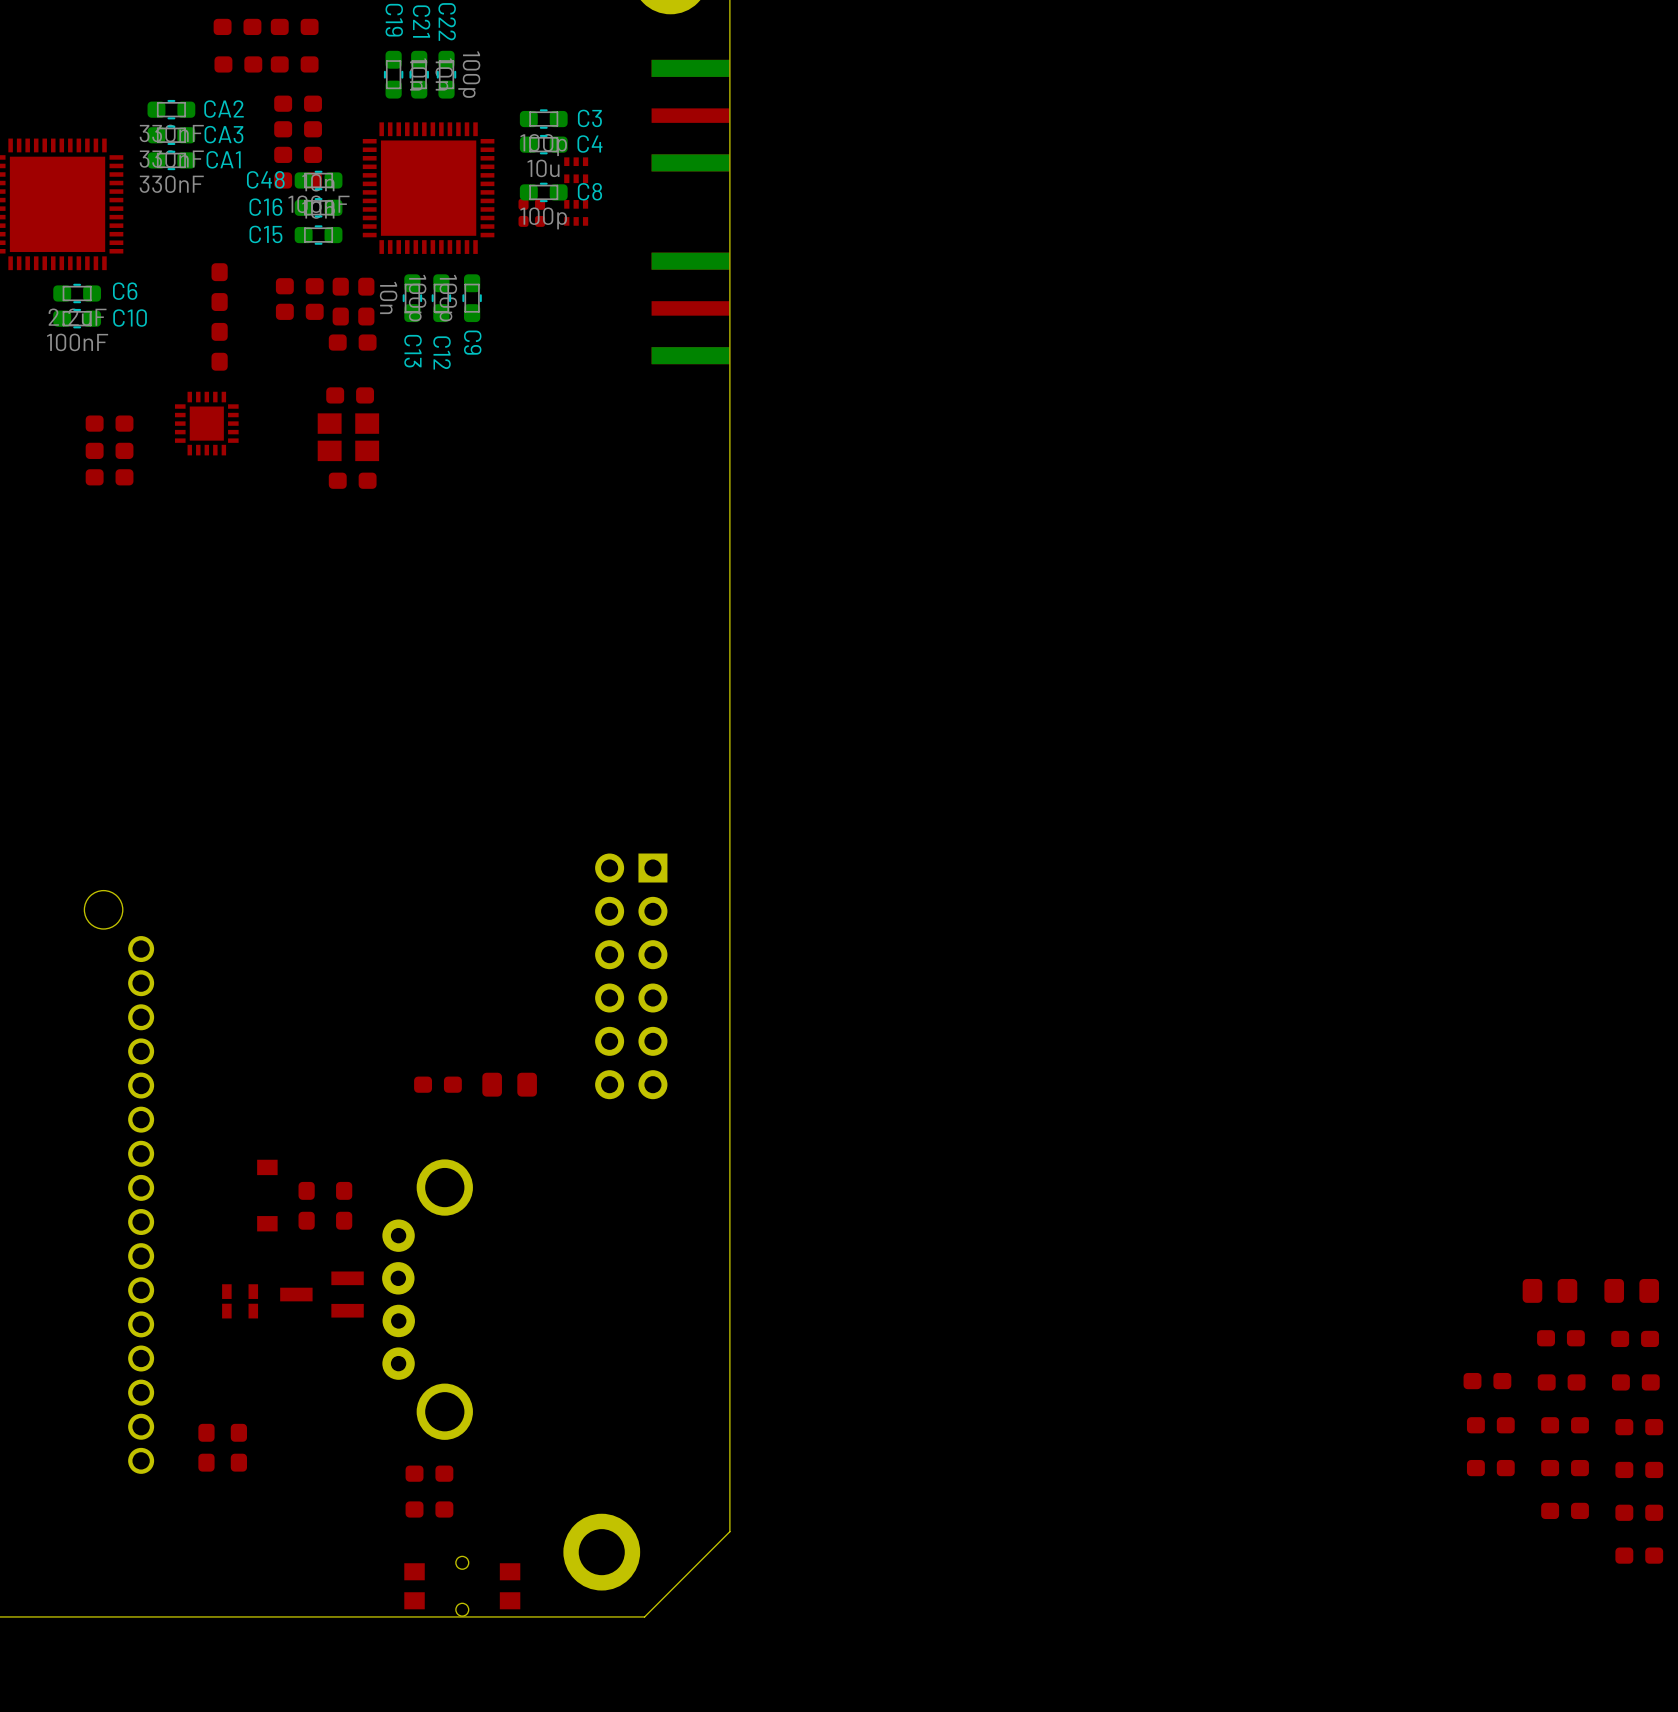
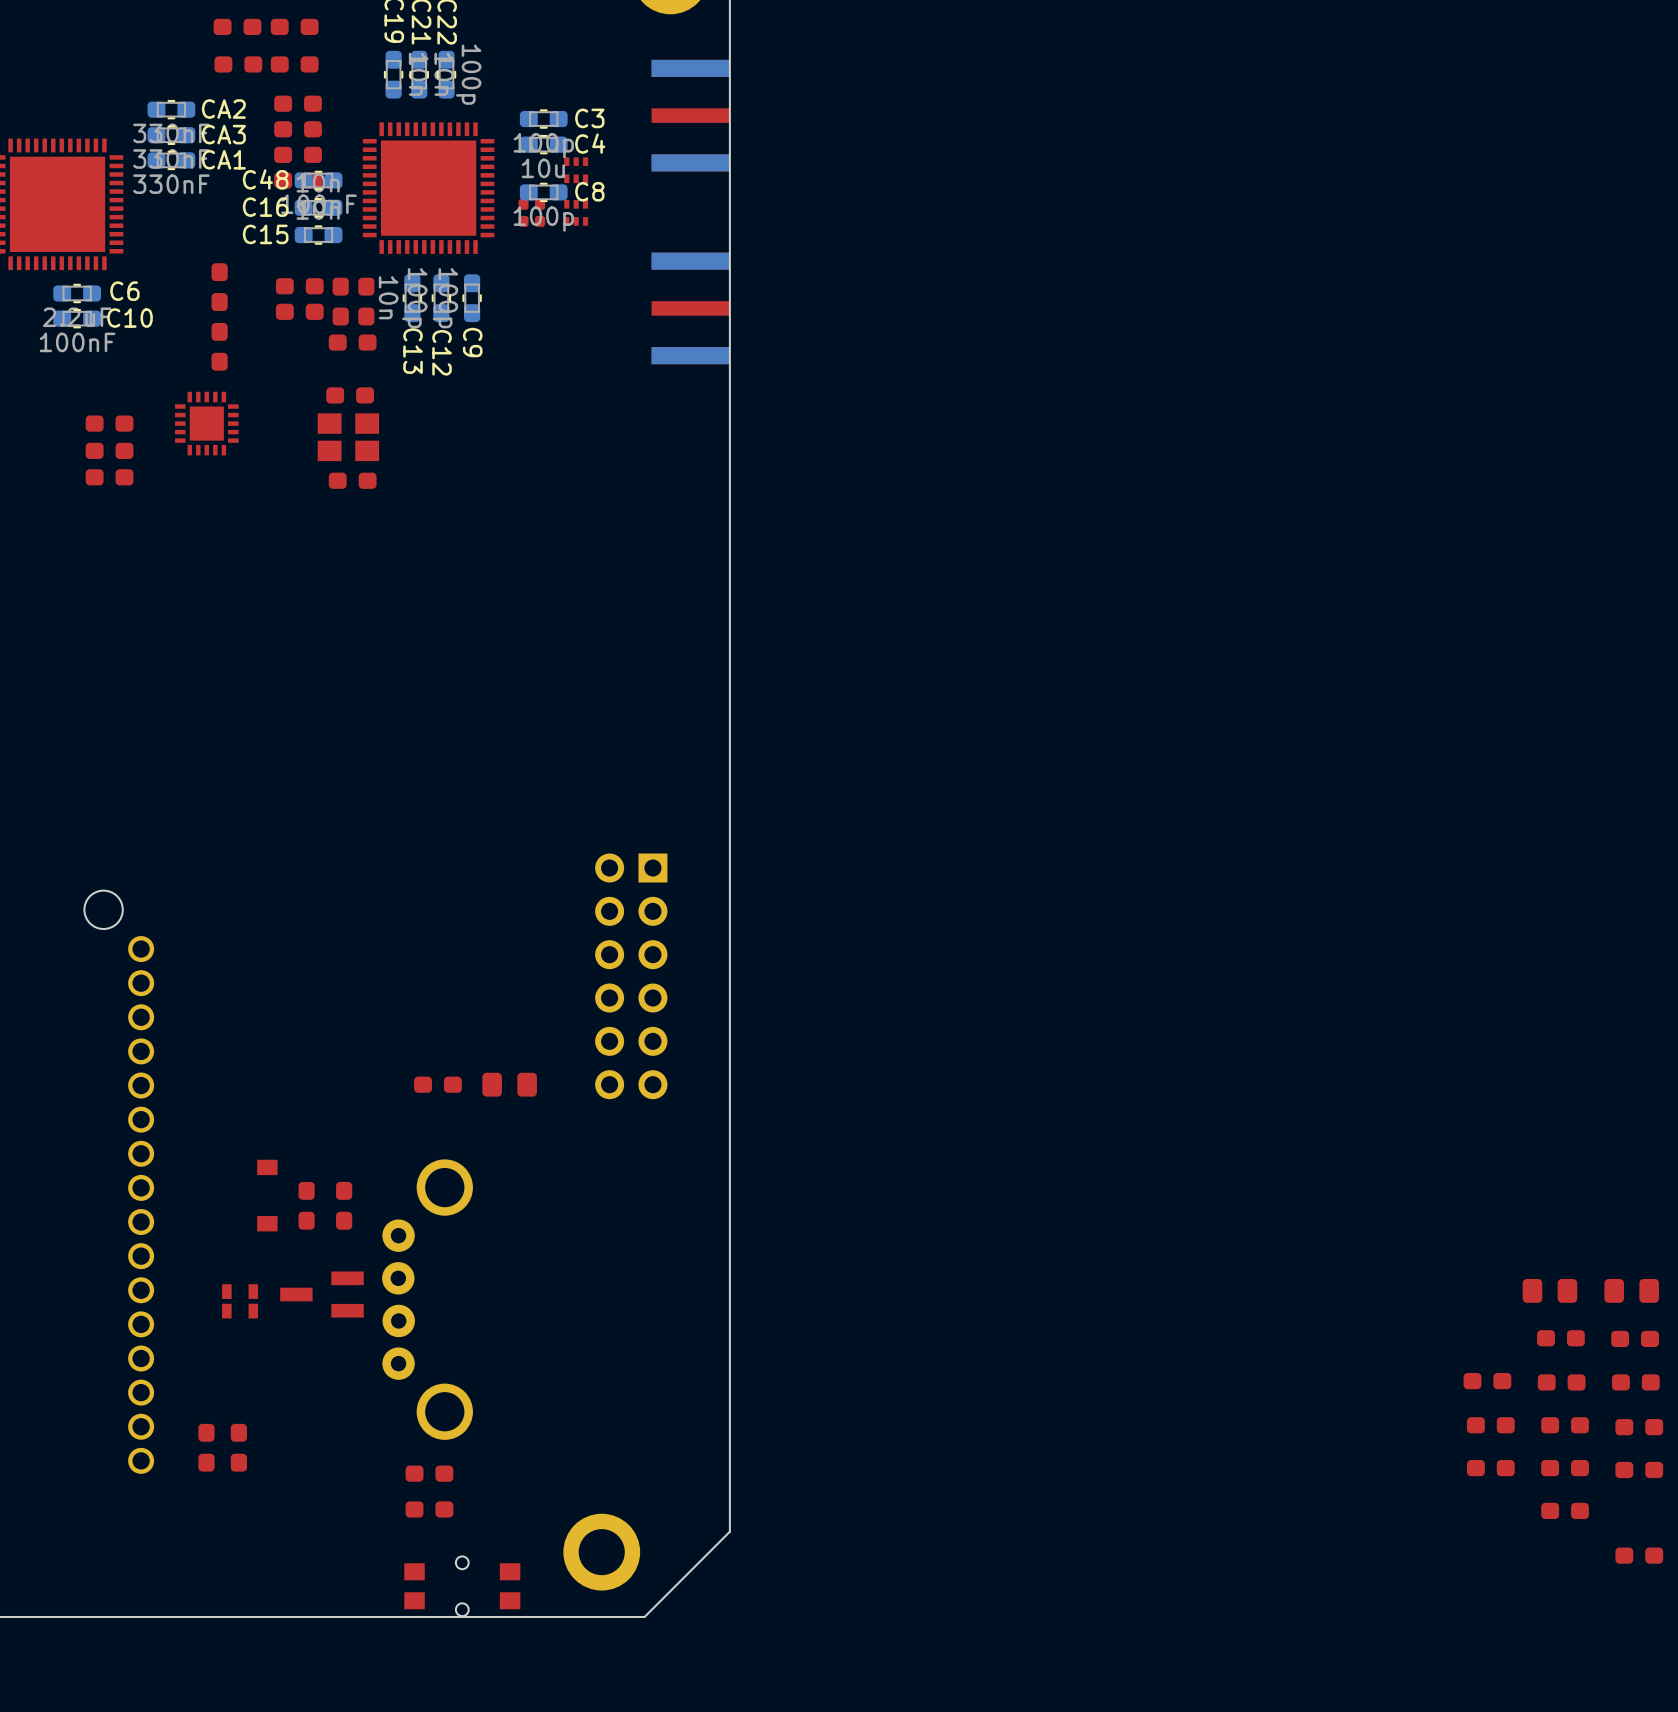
part: (1639, 1512) -> none

